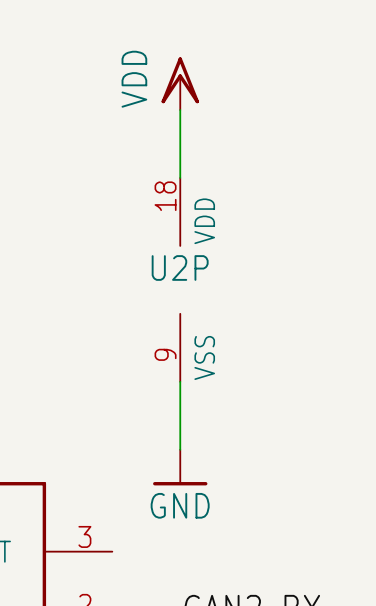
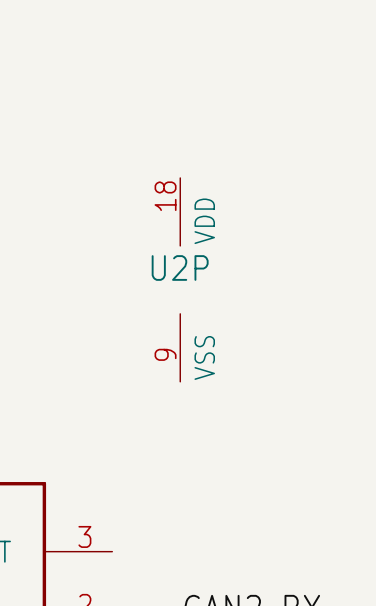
power symbol: VDD (180, 83) -> none
wire: (180, 110) (180, 177) -> none
wire: (180, 381) (180, 449) -> none
power symbol: GND (180, 467) -> none

